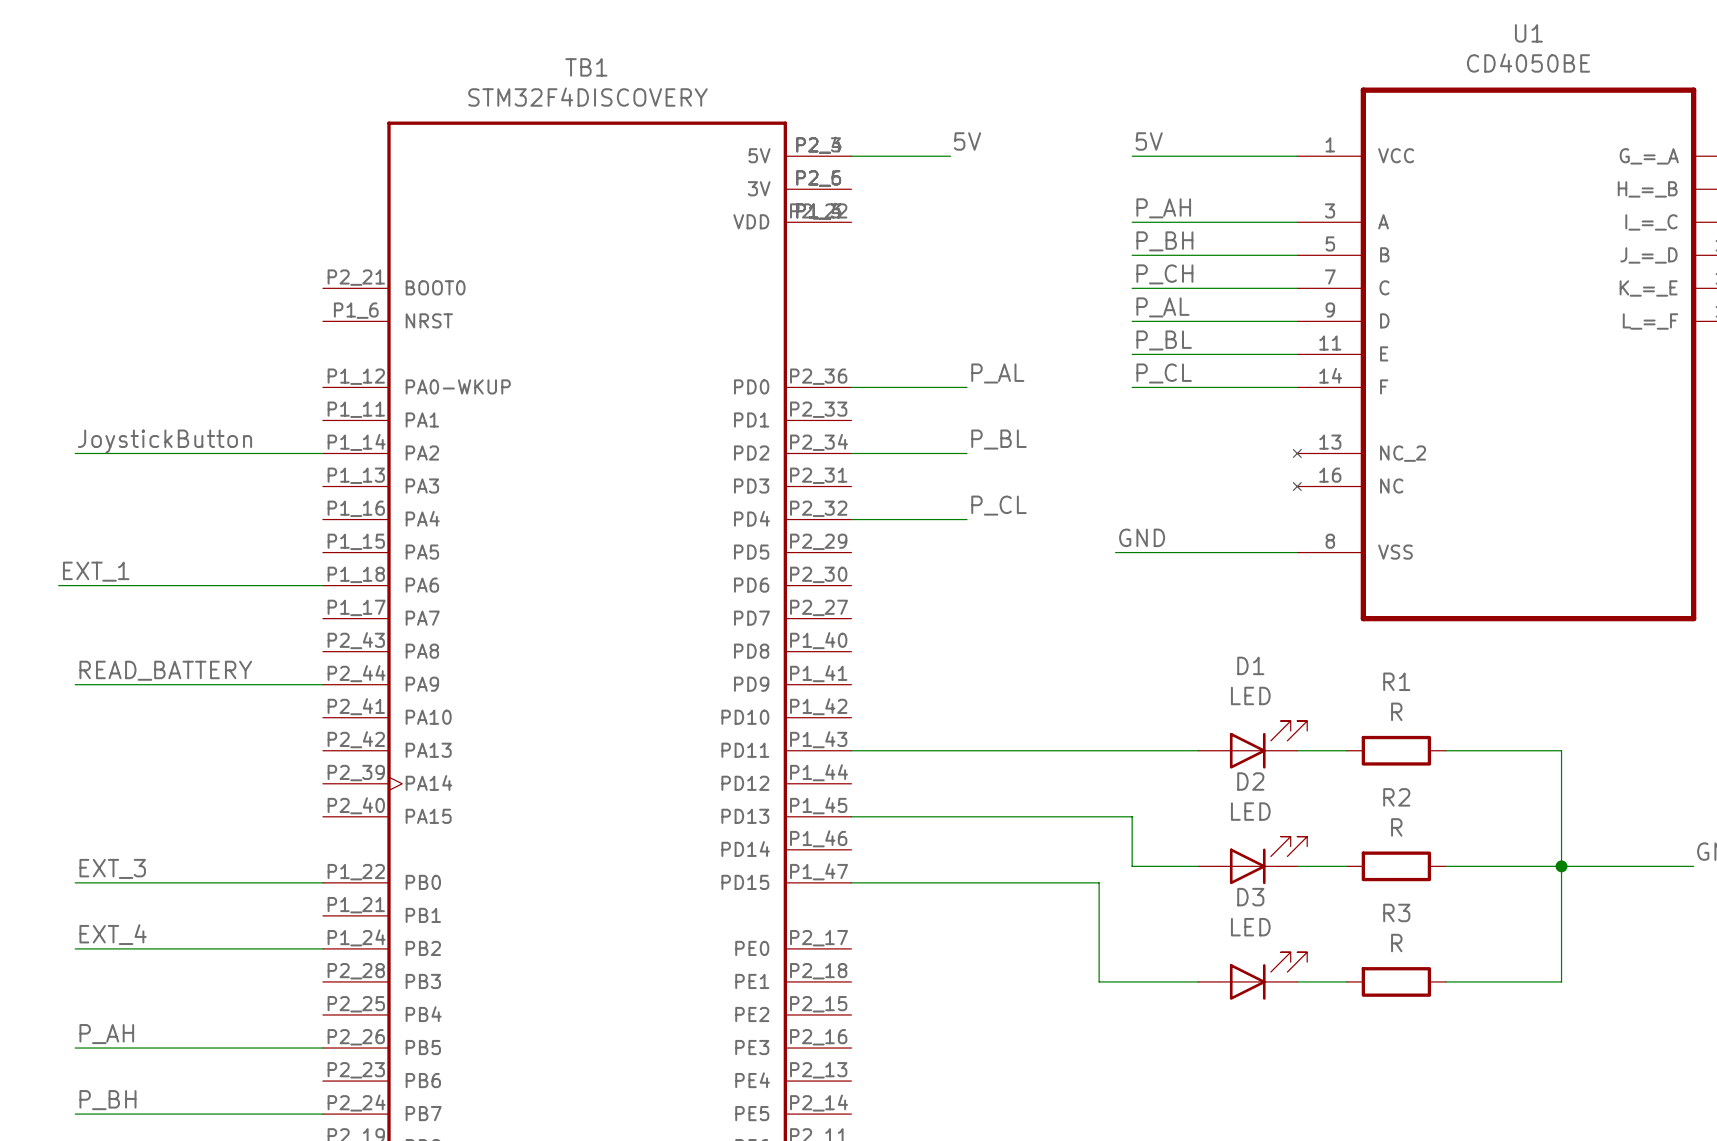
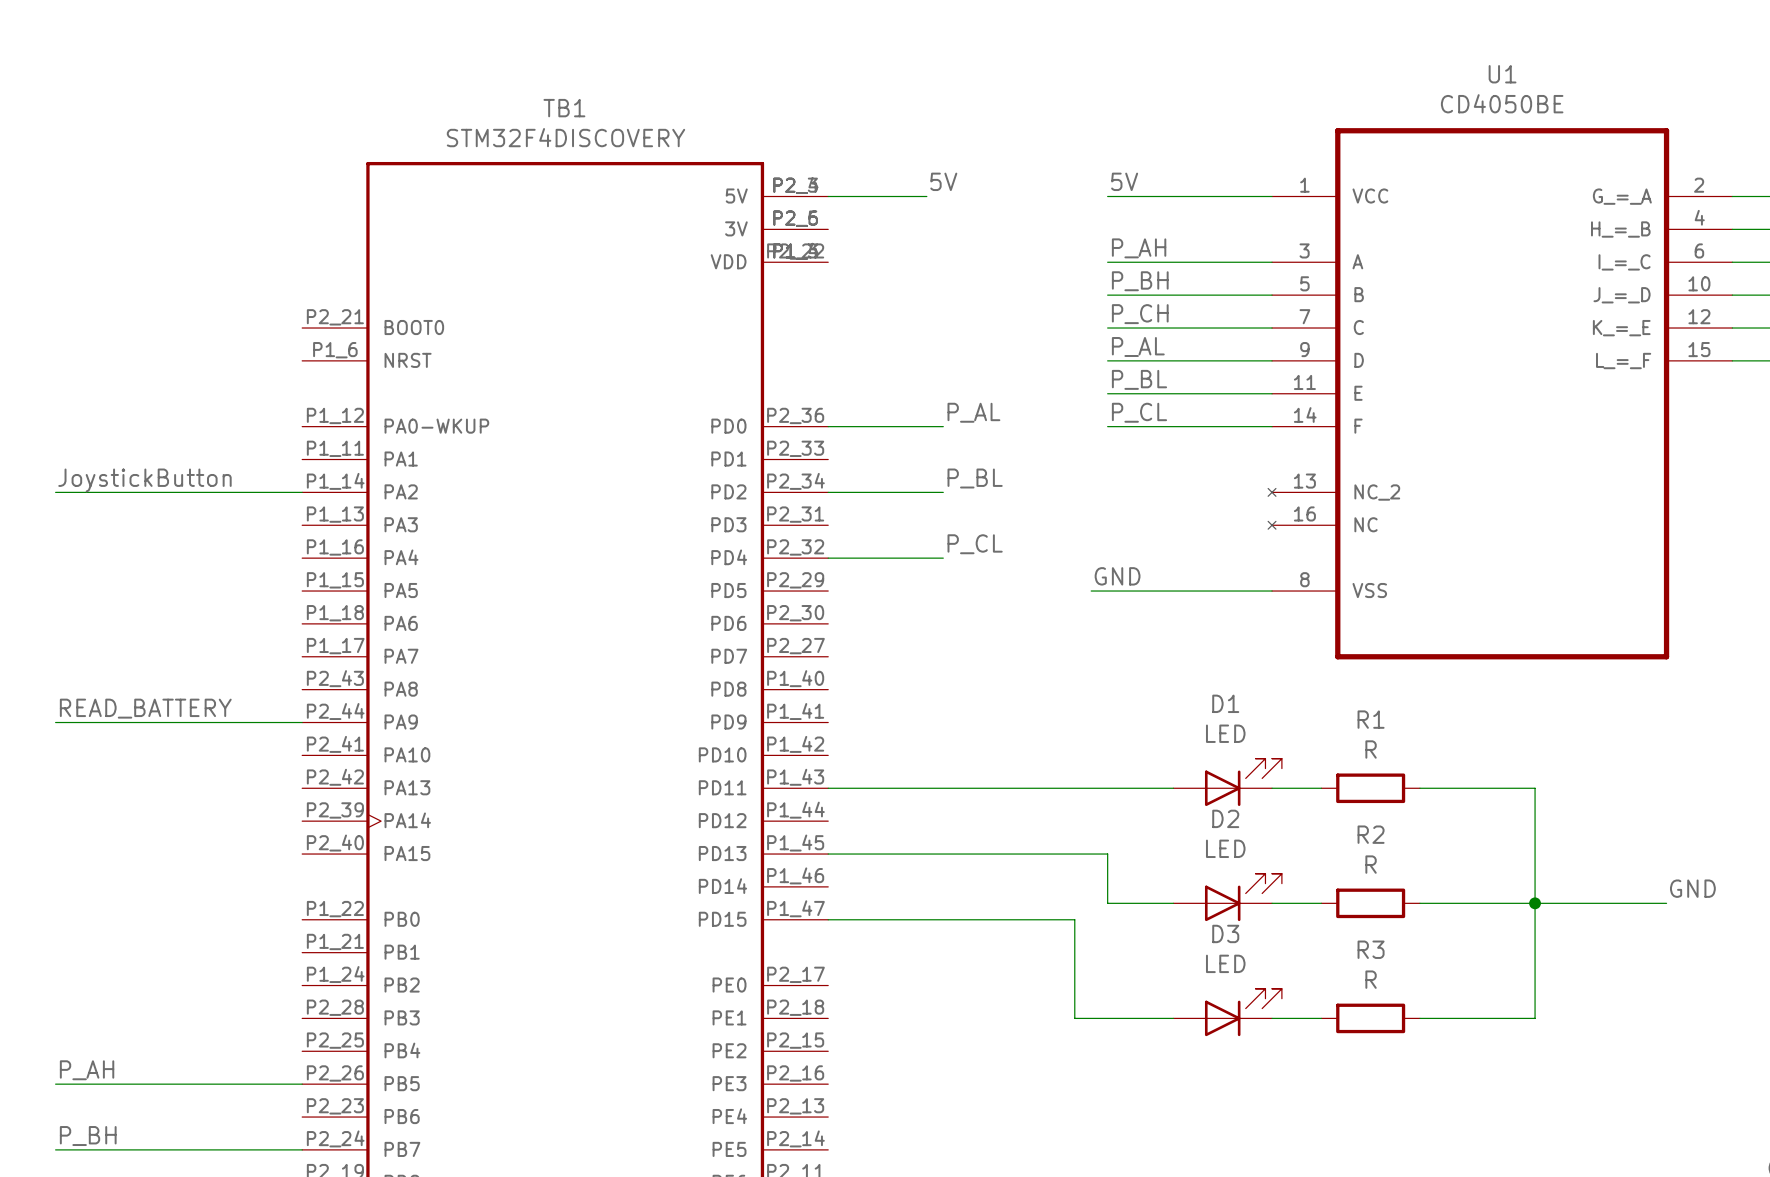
label: EXT_1 (96, 571) -> none
wire: (58, 585) (322, 585) -> none
label: EXT_3 (112, 868) -> none
wire: (75, 882) (322, 882) -> none
label: EXT_4 (113, 934) -> none
wire: (75, 948) (322, 948) -> none

